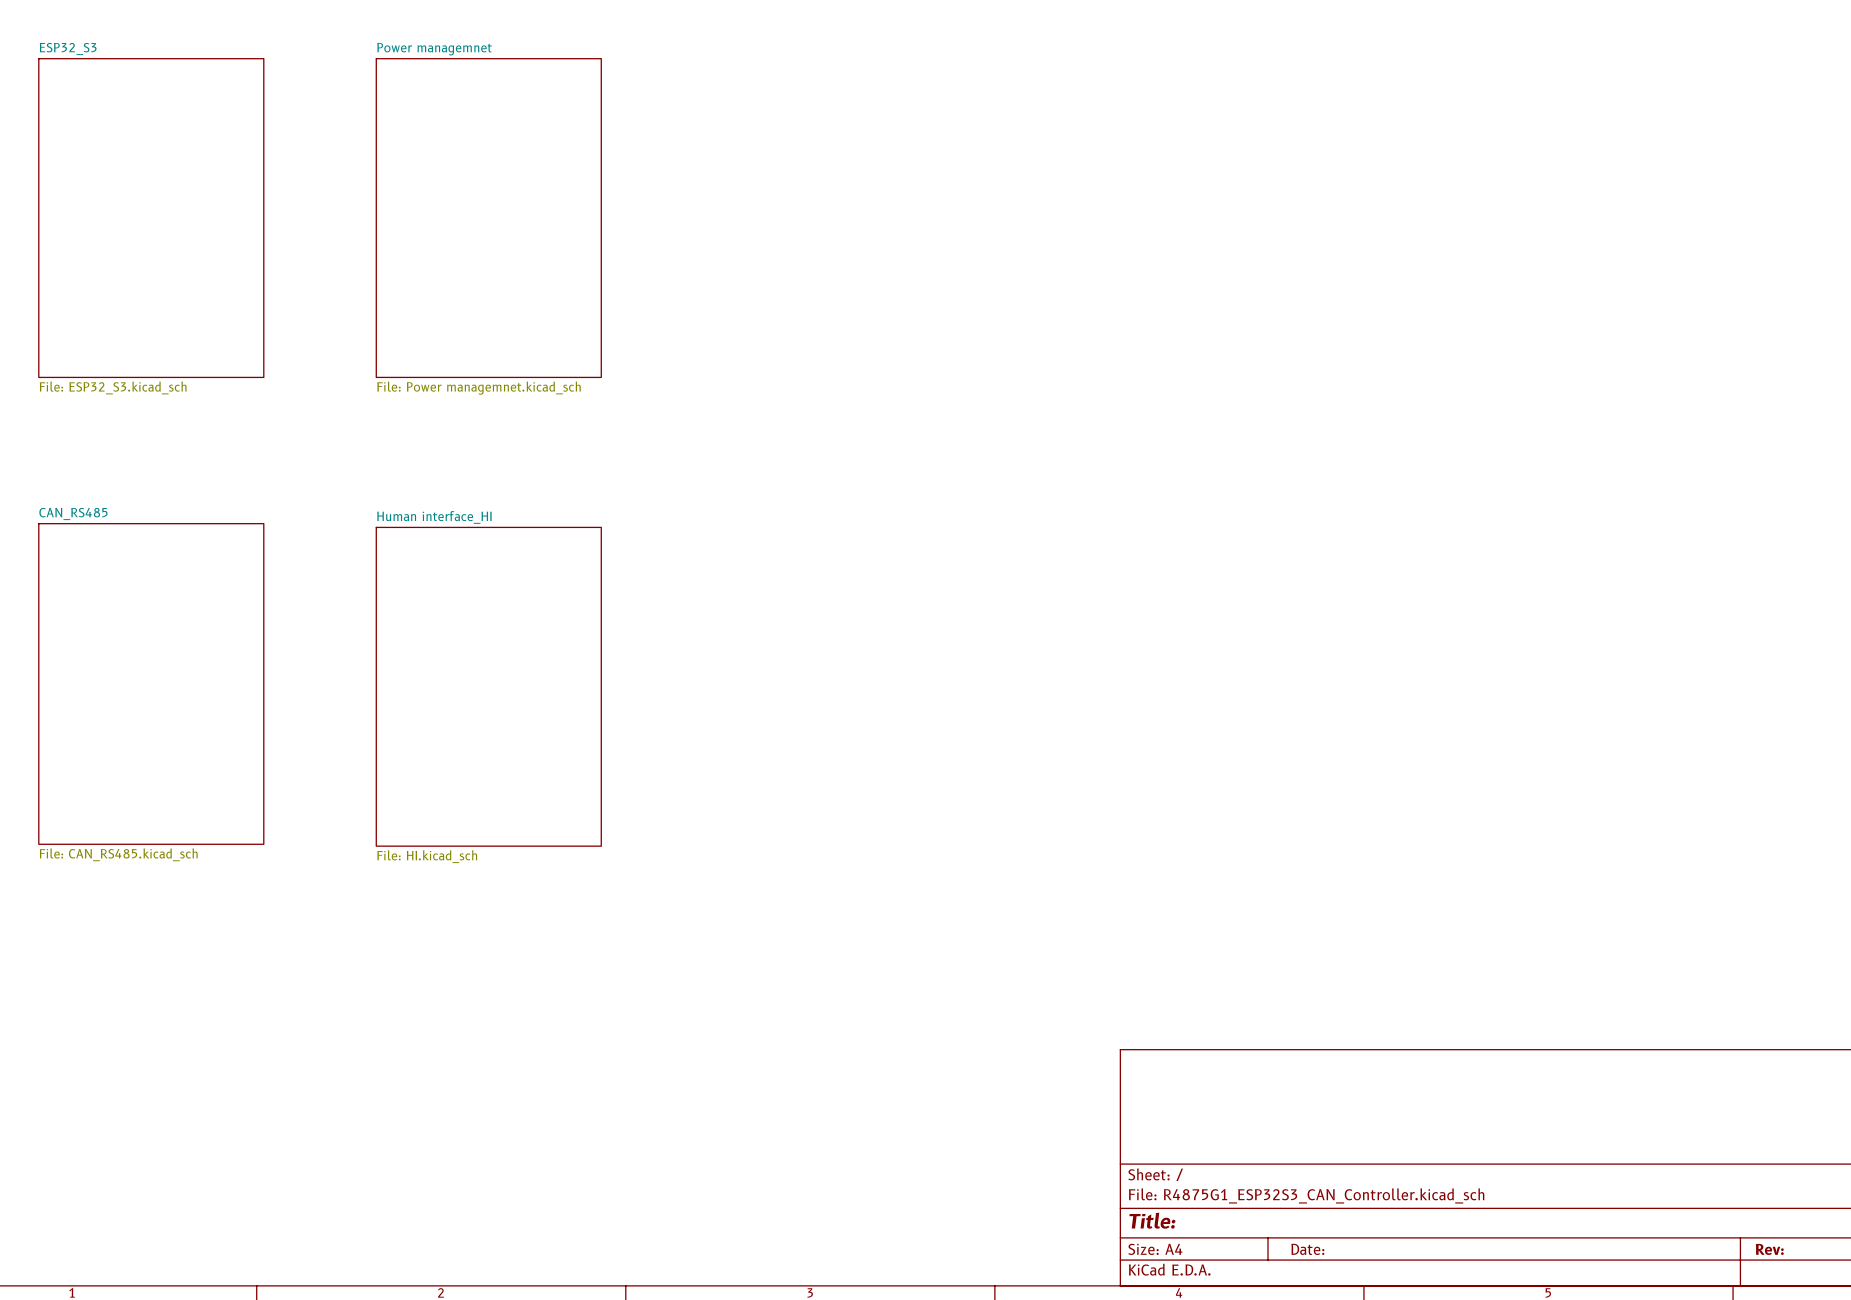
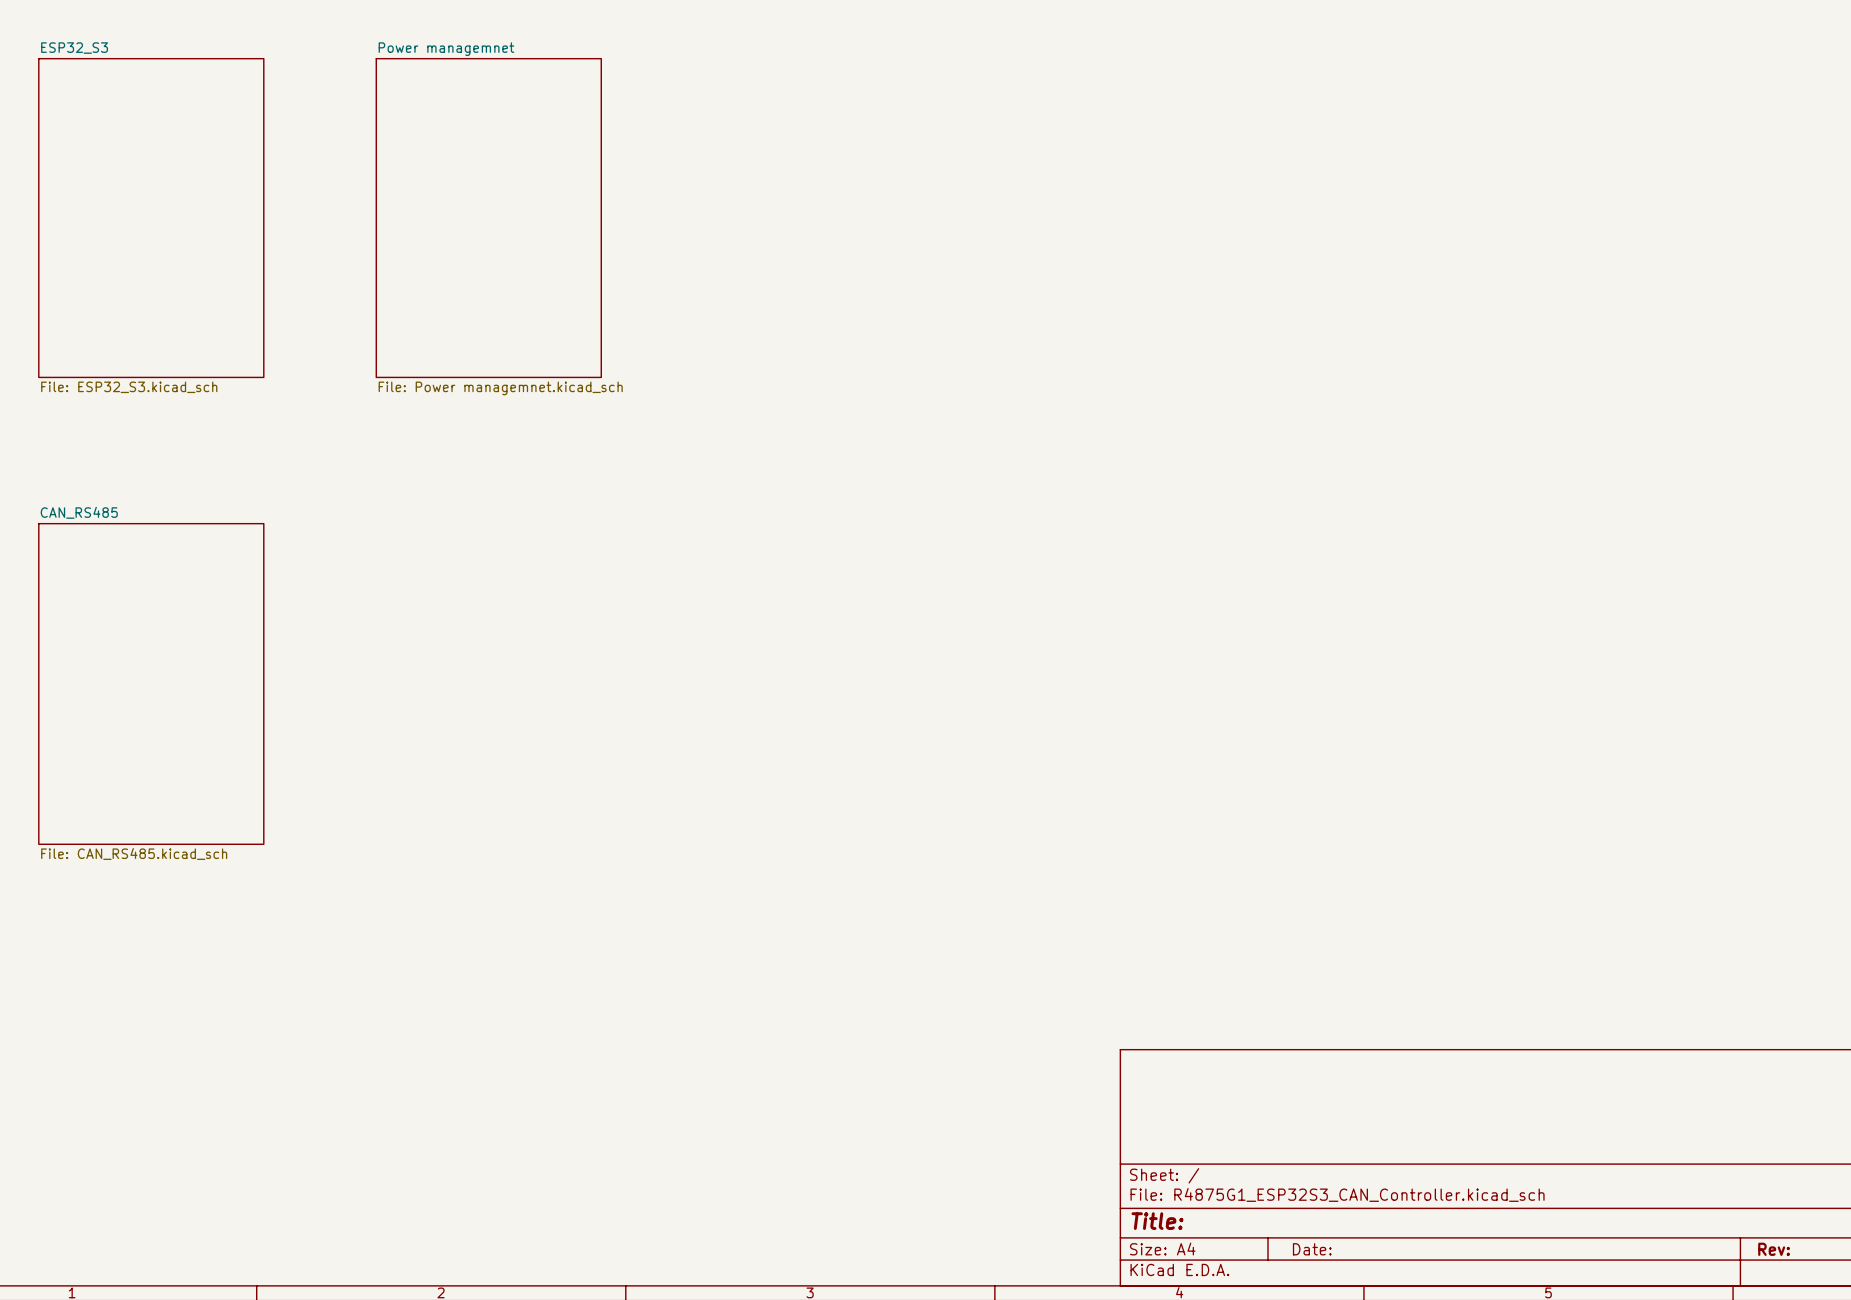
sheet Human interface_HI: File: HI.kicad_sch (488, 686) -> none

